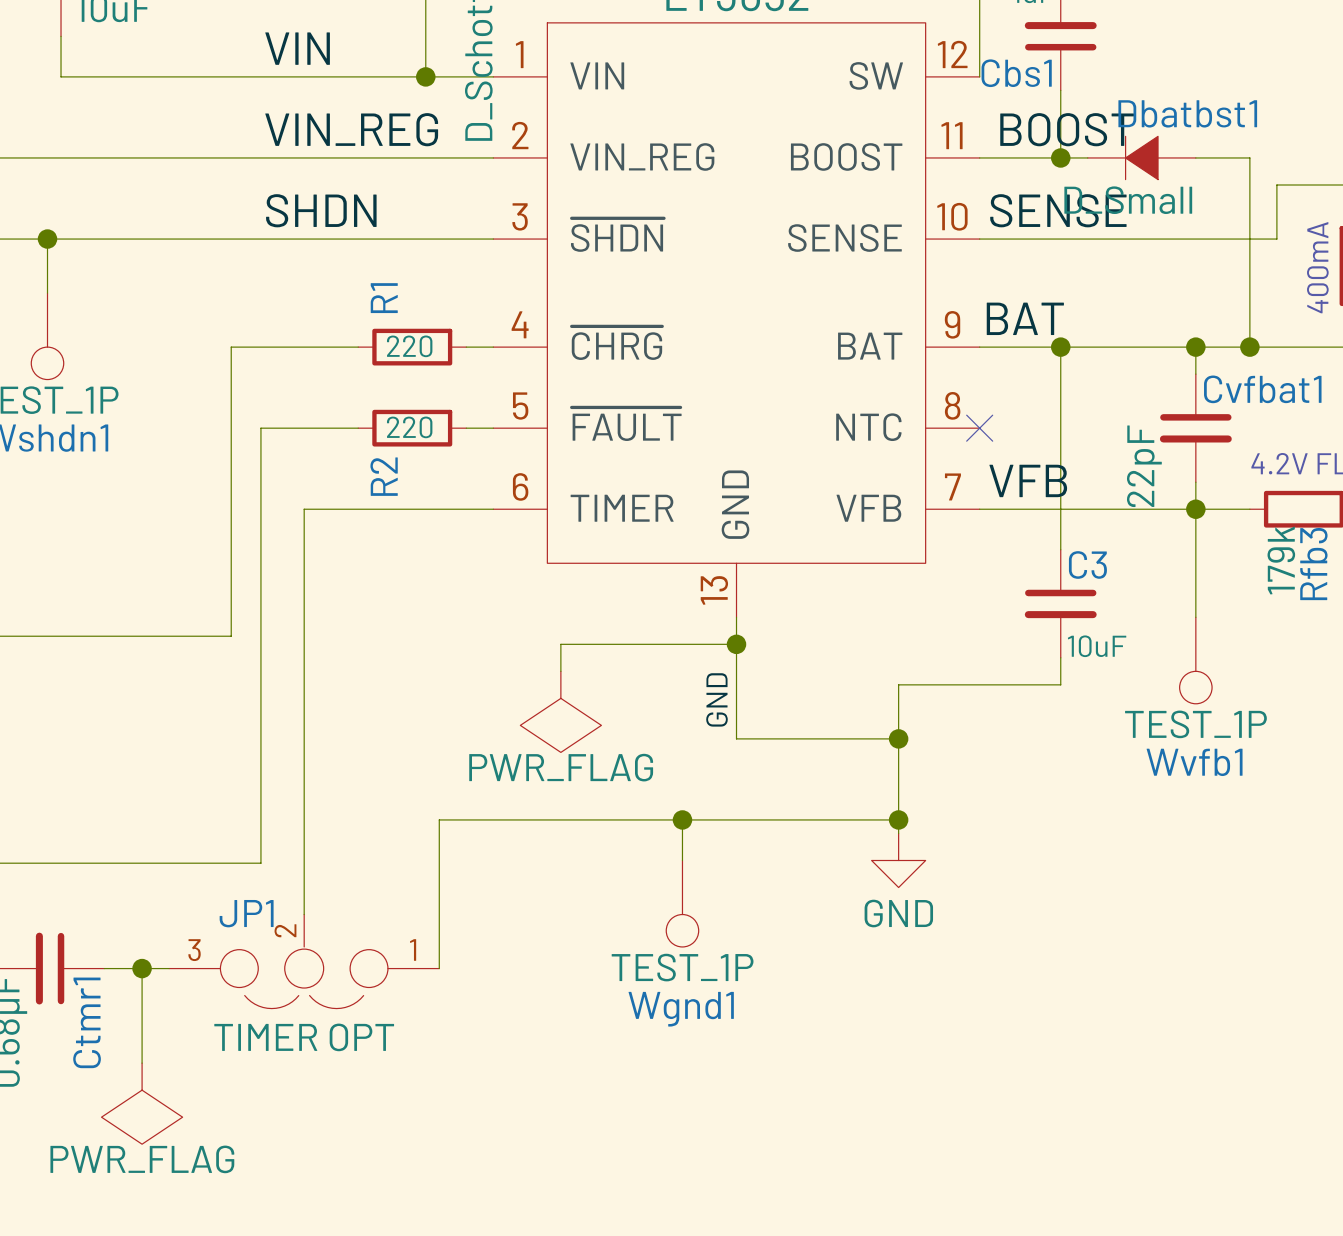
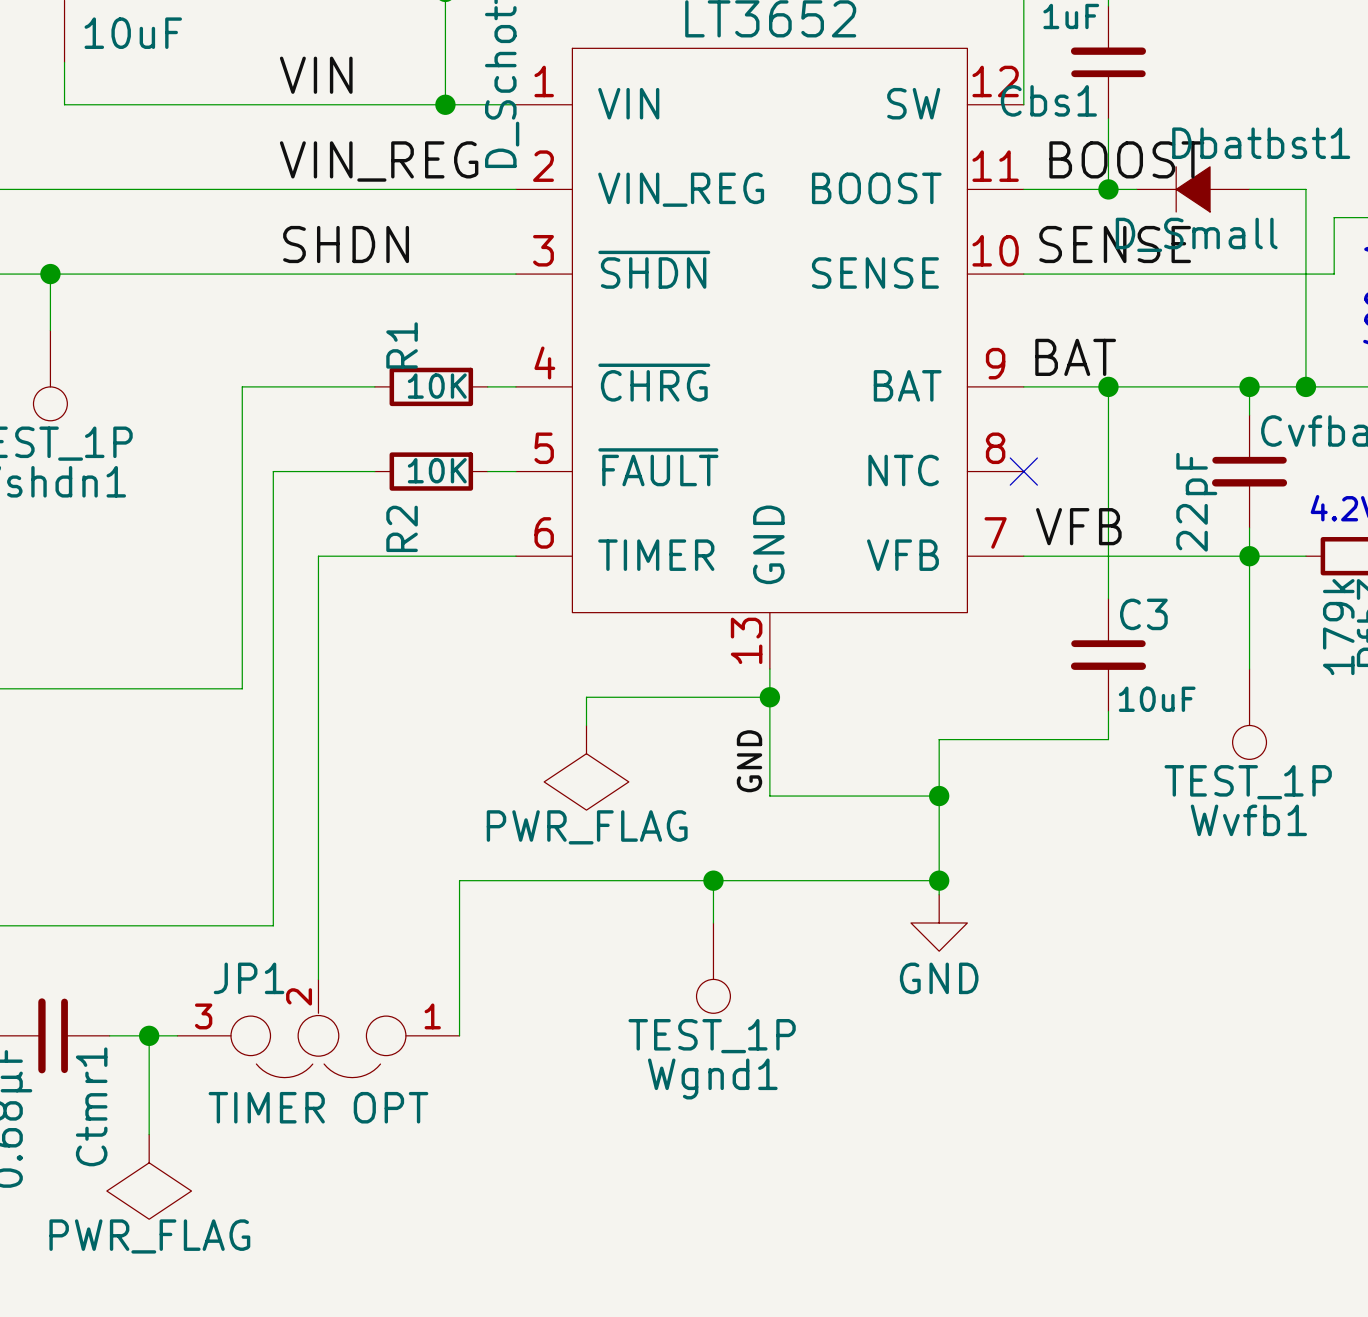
R1 value: 220 (409, 346) -> 10K (437, 386)
R2 value: 220 (409, 427) -> 10K (437, 470)

